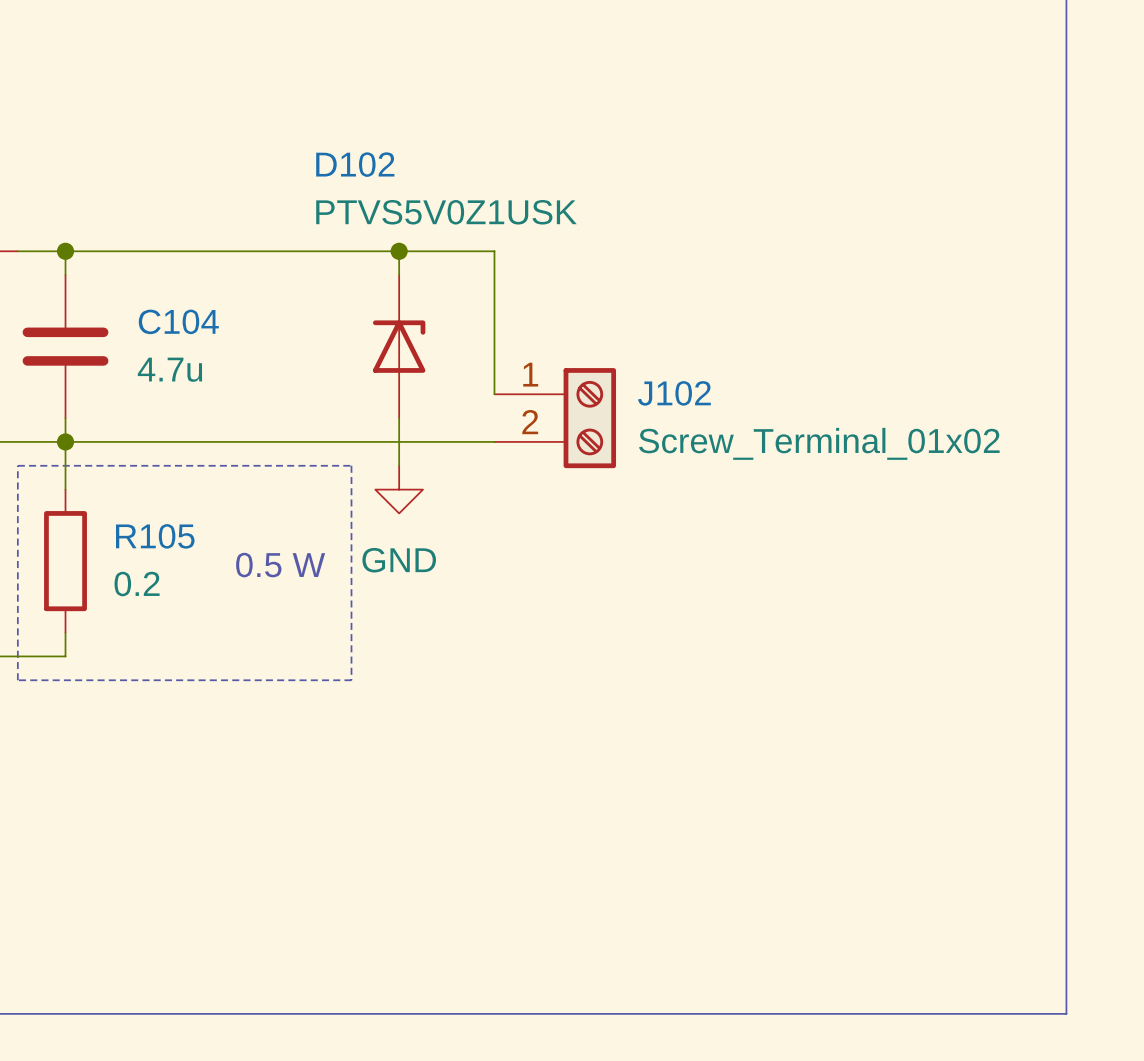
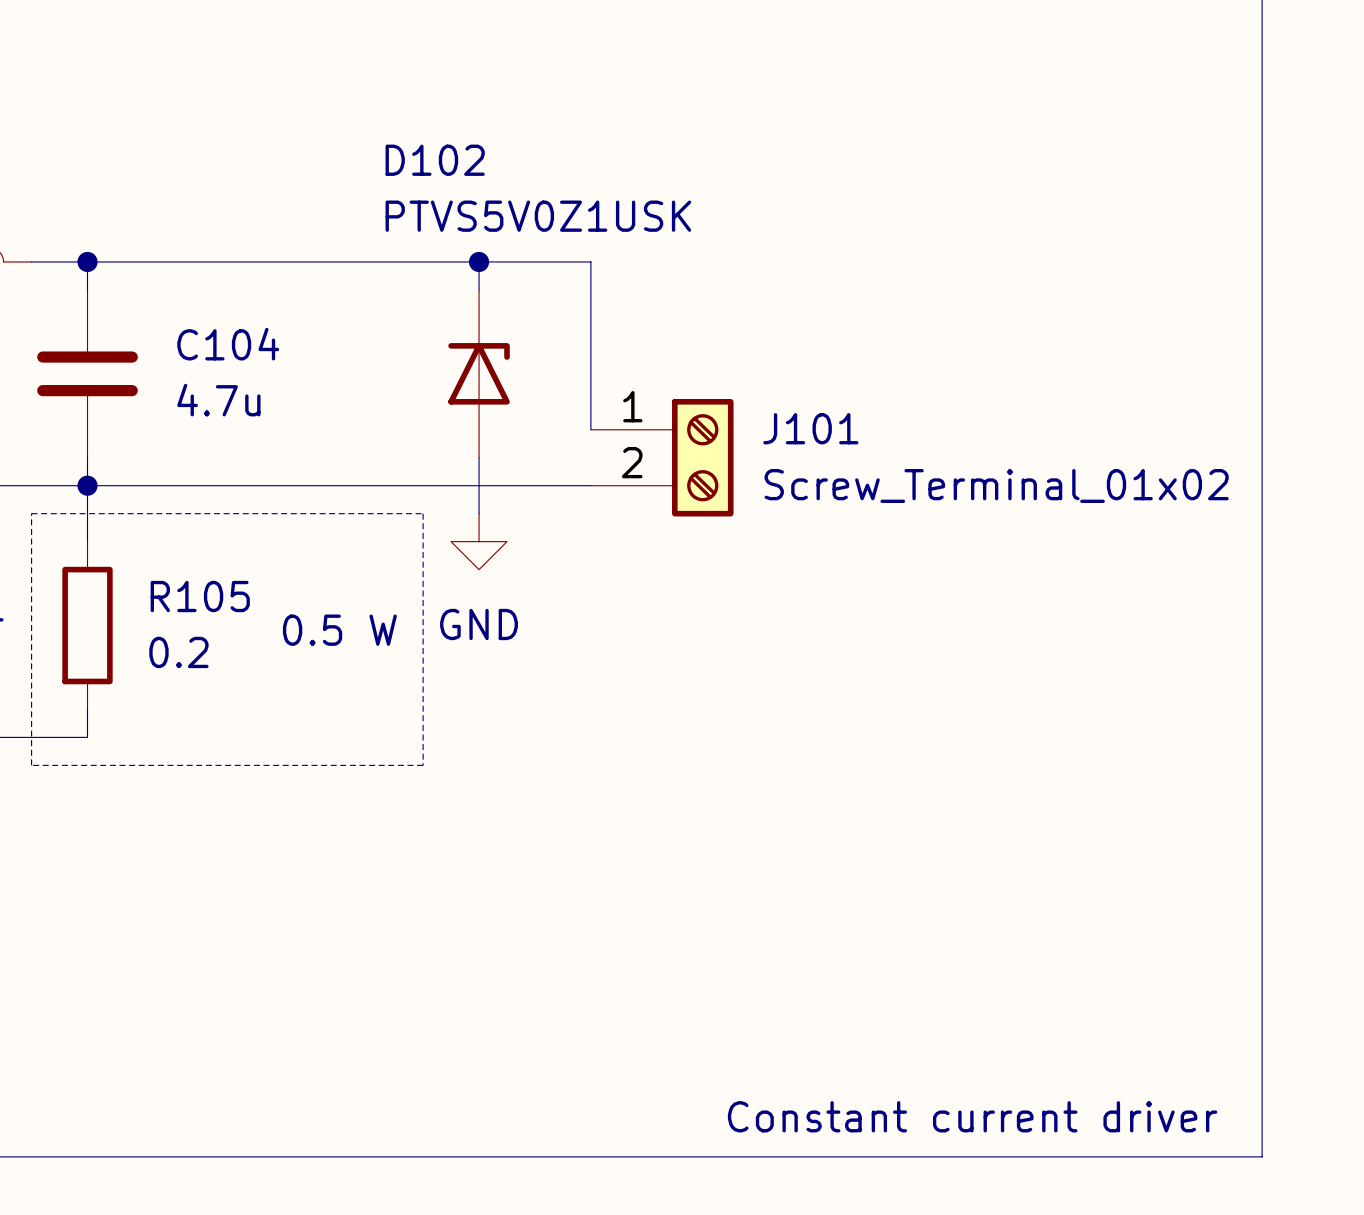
J102 name: J102 (674, 393) -> J101 (810, 428)
text: none -> Constant current driver (972, 1116)

